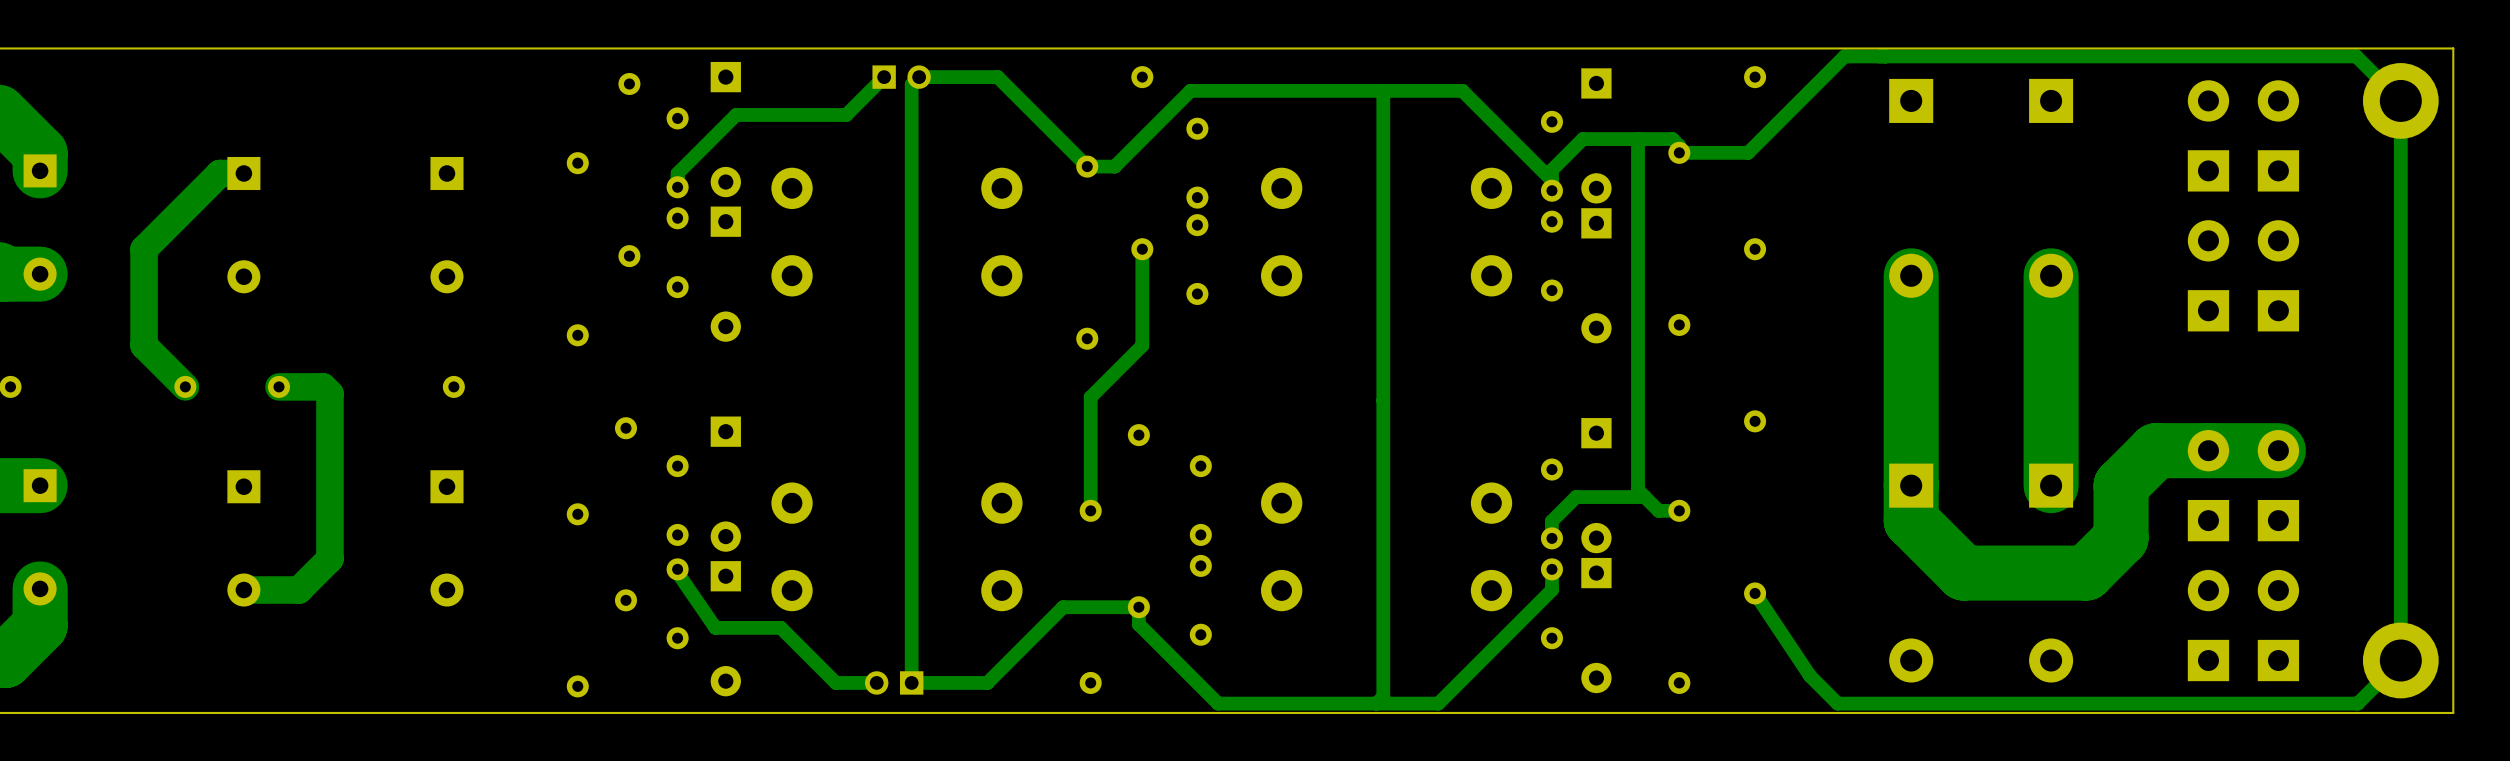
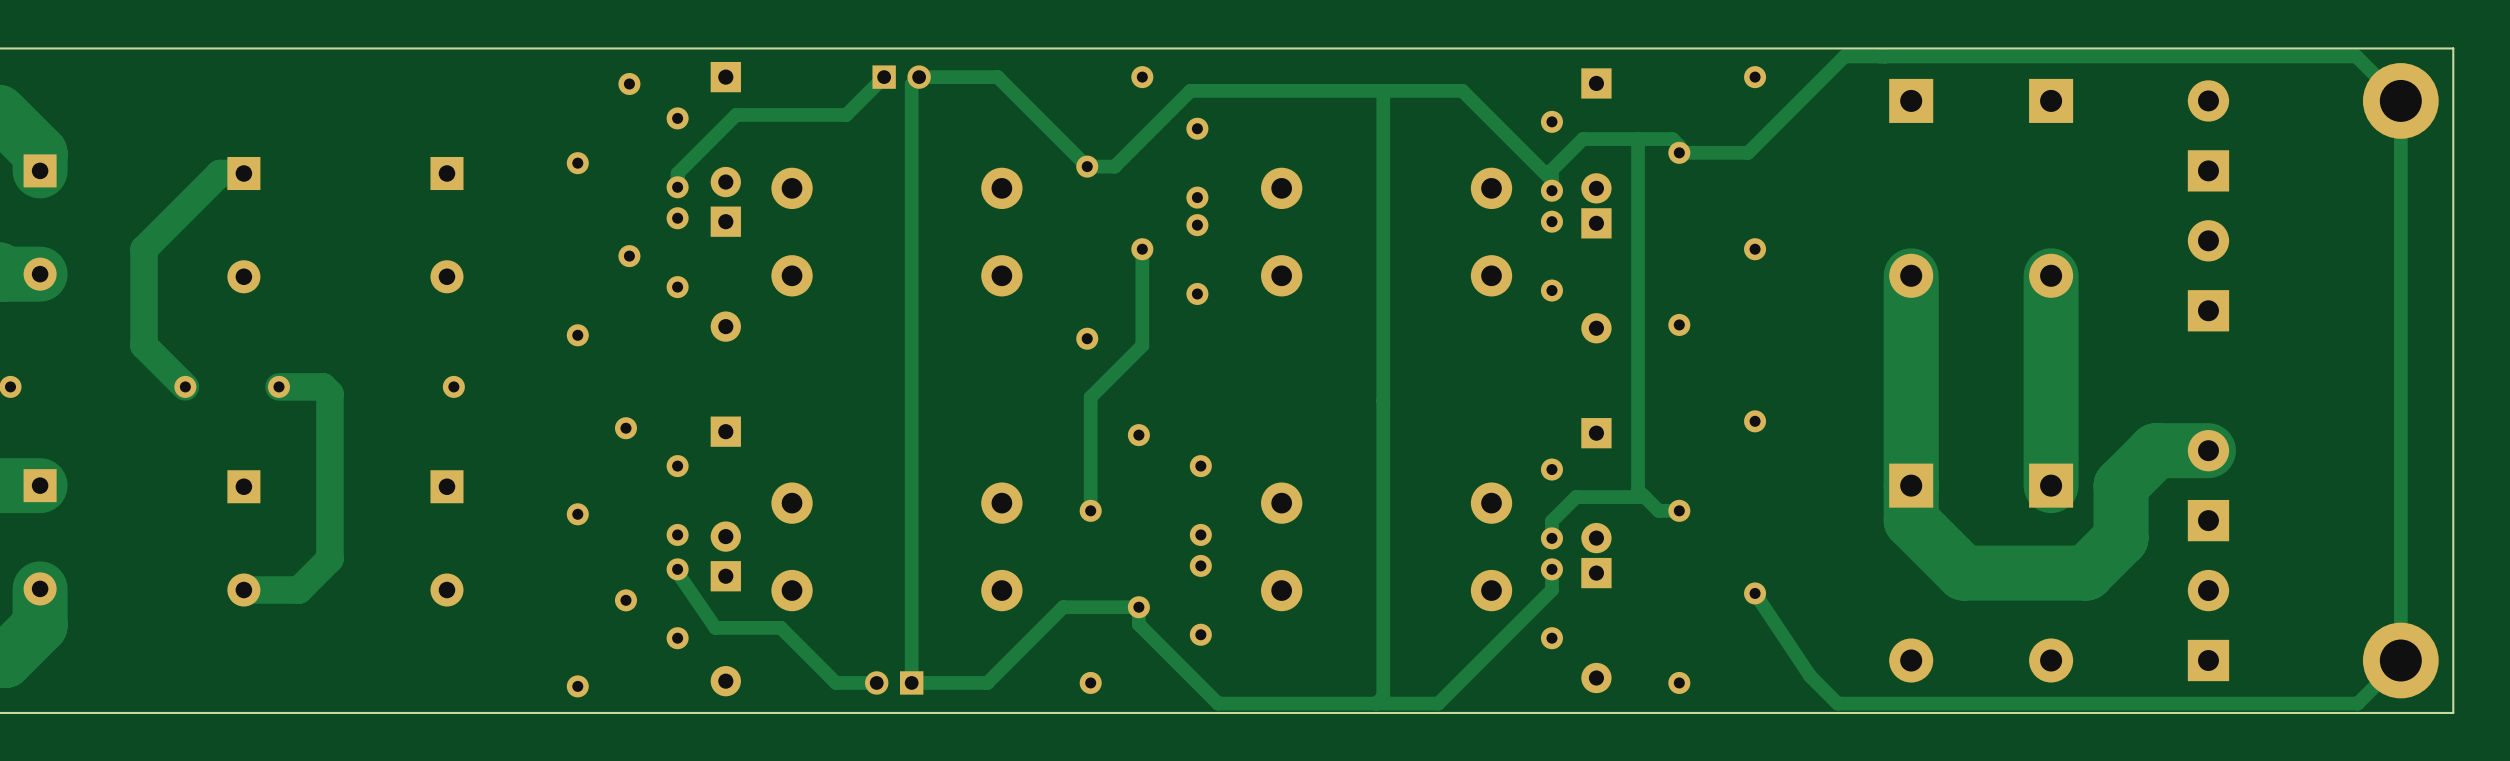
part: (2243, 135) -> none
part: (2243, 275) -> none
track: (2278, 450) (2208, 450) -> none
part: (2243, 485) -> none
part: (2243, 625) -> none

